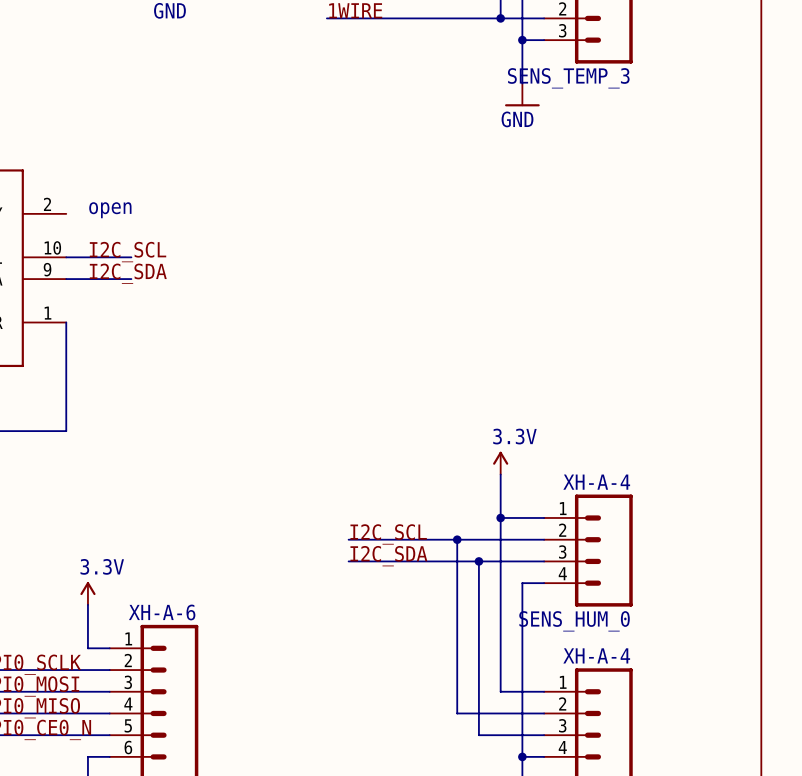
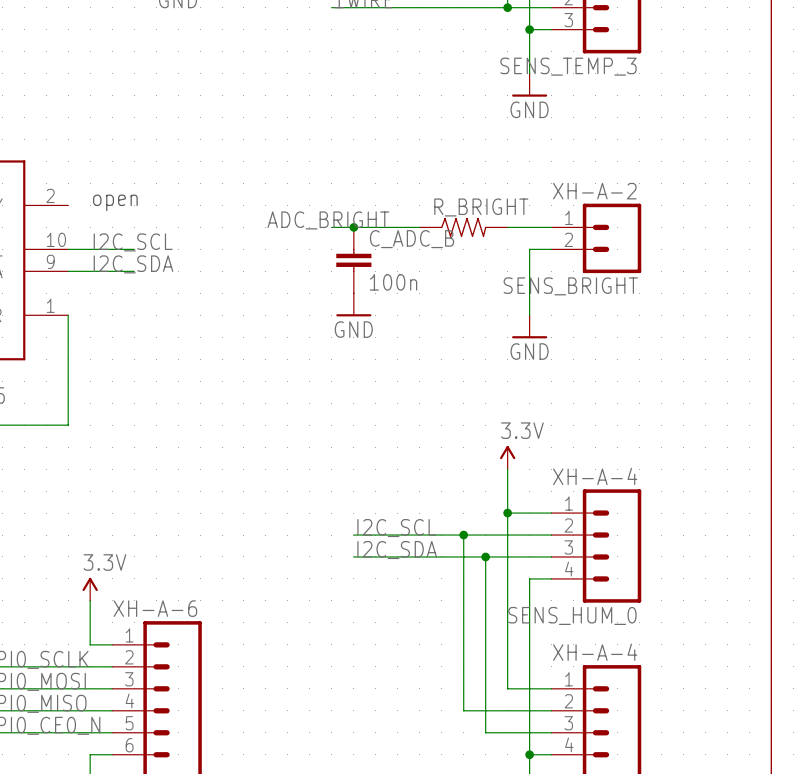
label: none -> ADC_BRIGHT (328, 220)
wire: none -> (331, 227) (419, 227)
junction: none -> (353, 227)
R_BRIGHT: none -> (463, 227)
wire: none -> (507, 227) (551, 227)
SENS_BRIGHT: none -> XH-A-2 (596, 238)
wire: none -> (551, 249) (529, 249) (529, 315)
C_ADC_B: none -> 100n (353, 260)
power symbol: none -> GND (353, 304)
power symbol: none -> GND (529, 326)

